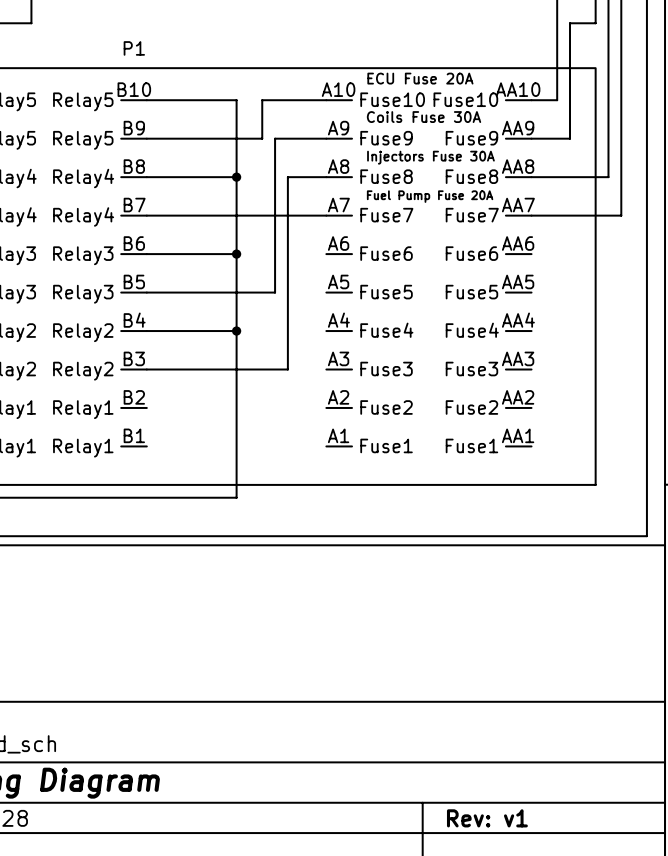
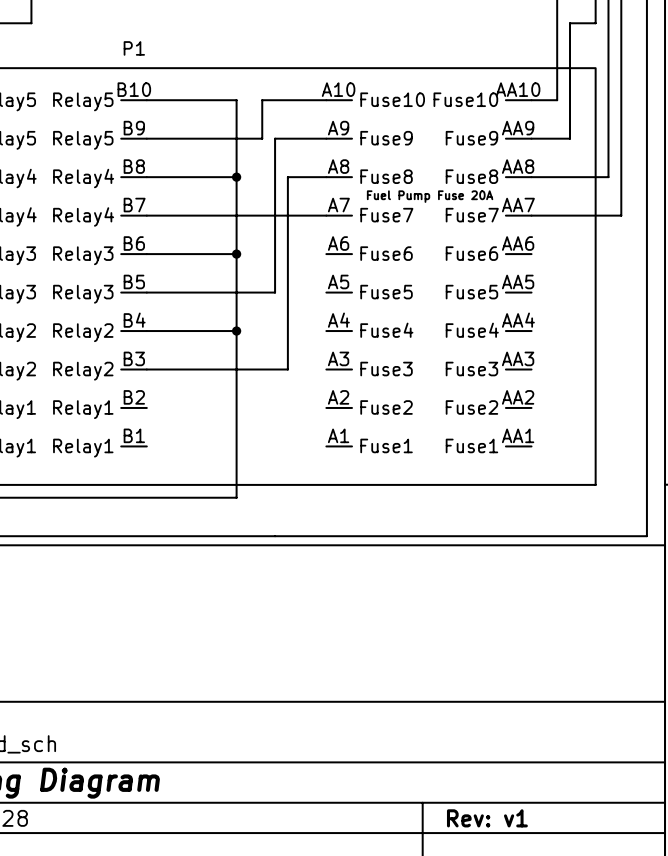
text: ECU Fuse 20A (420, 78) -> none
text: Coils Fuse 30A (424, 117) -> none
text: Injectors Fuse 30A (430, 157) -> none

